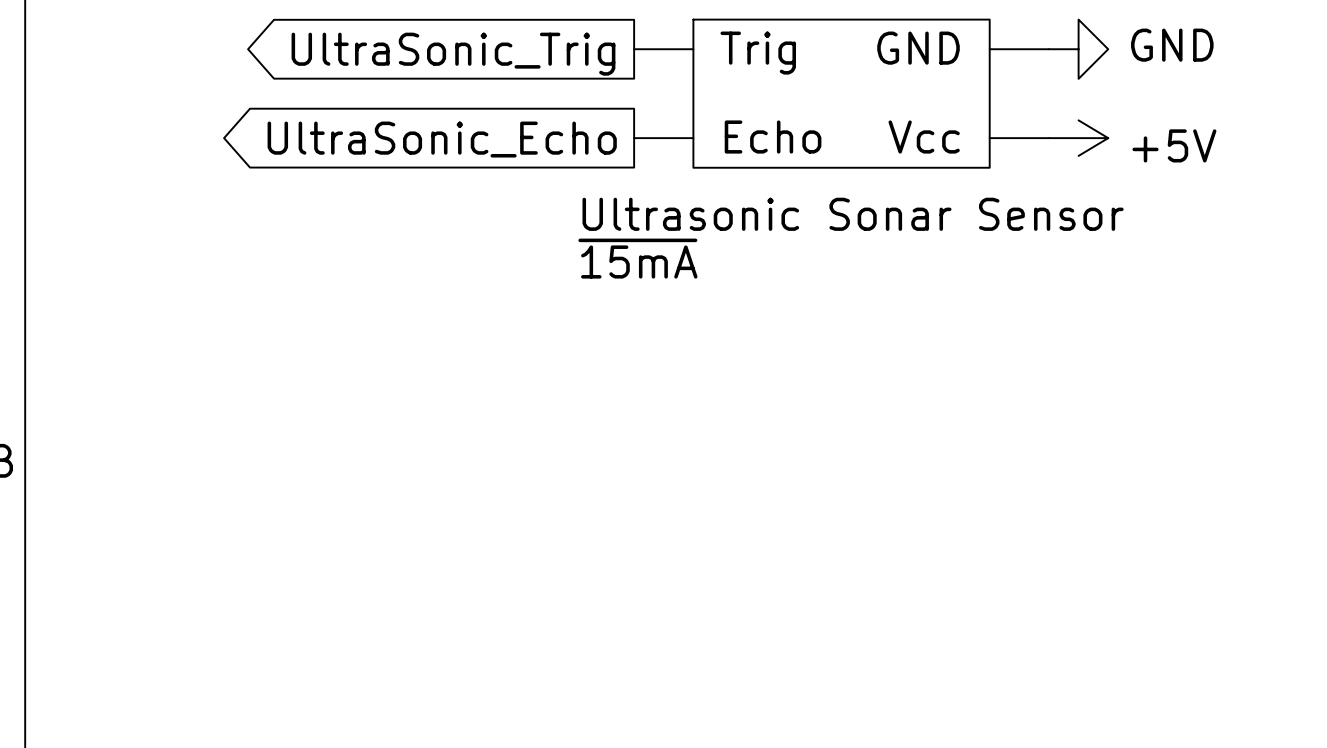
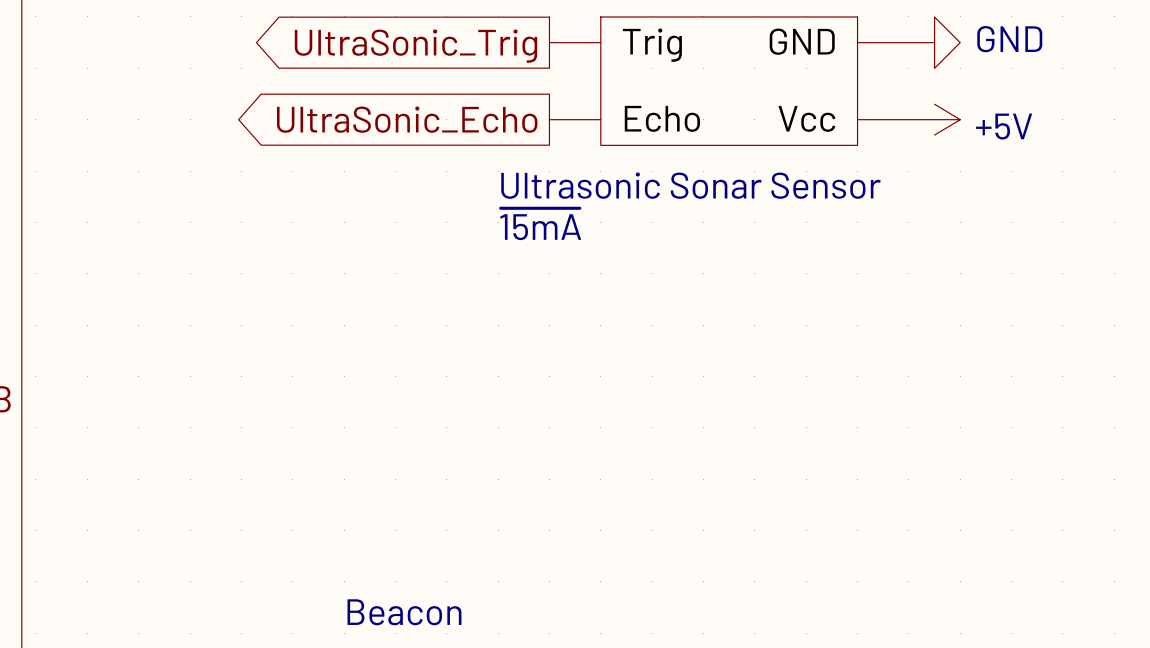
text: none -> Beacon (404, 612)

